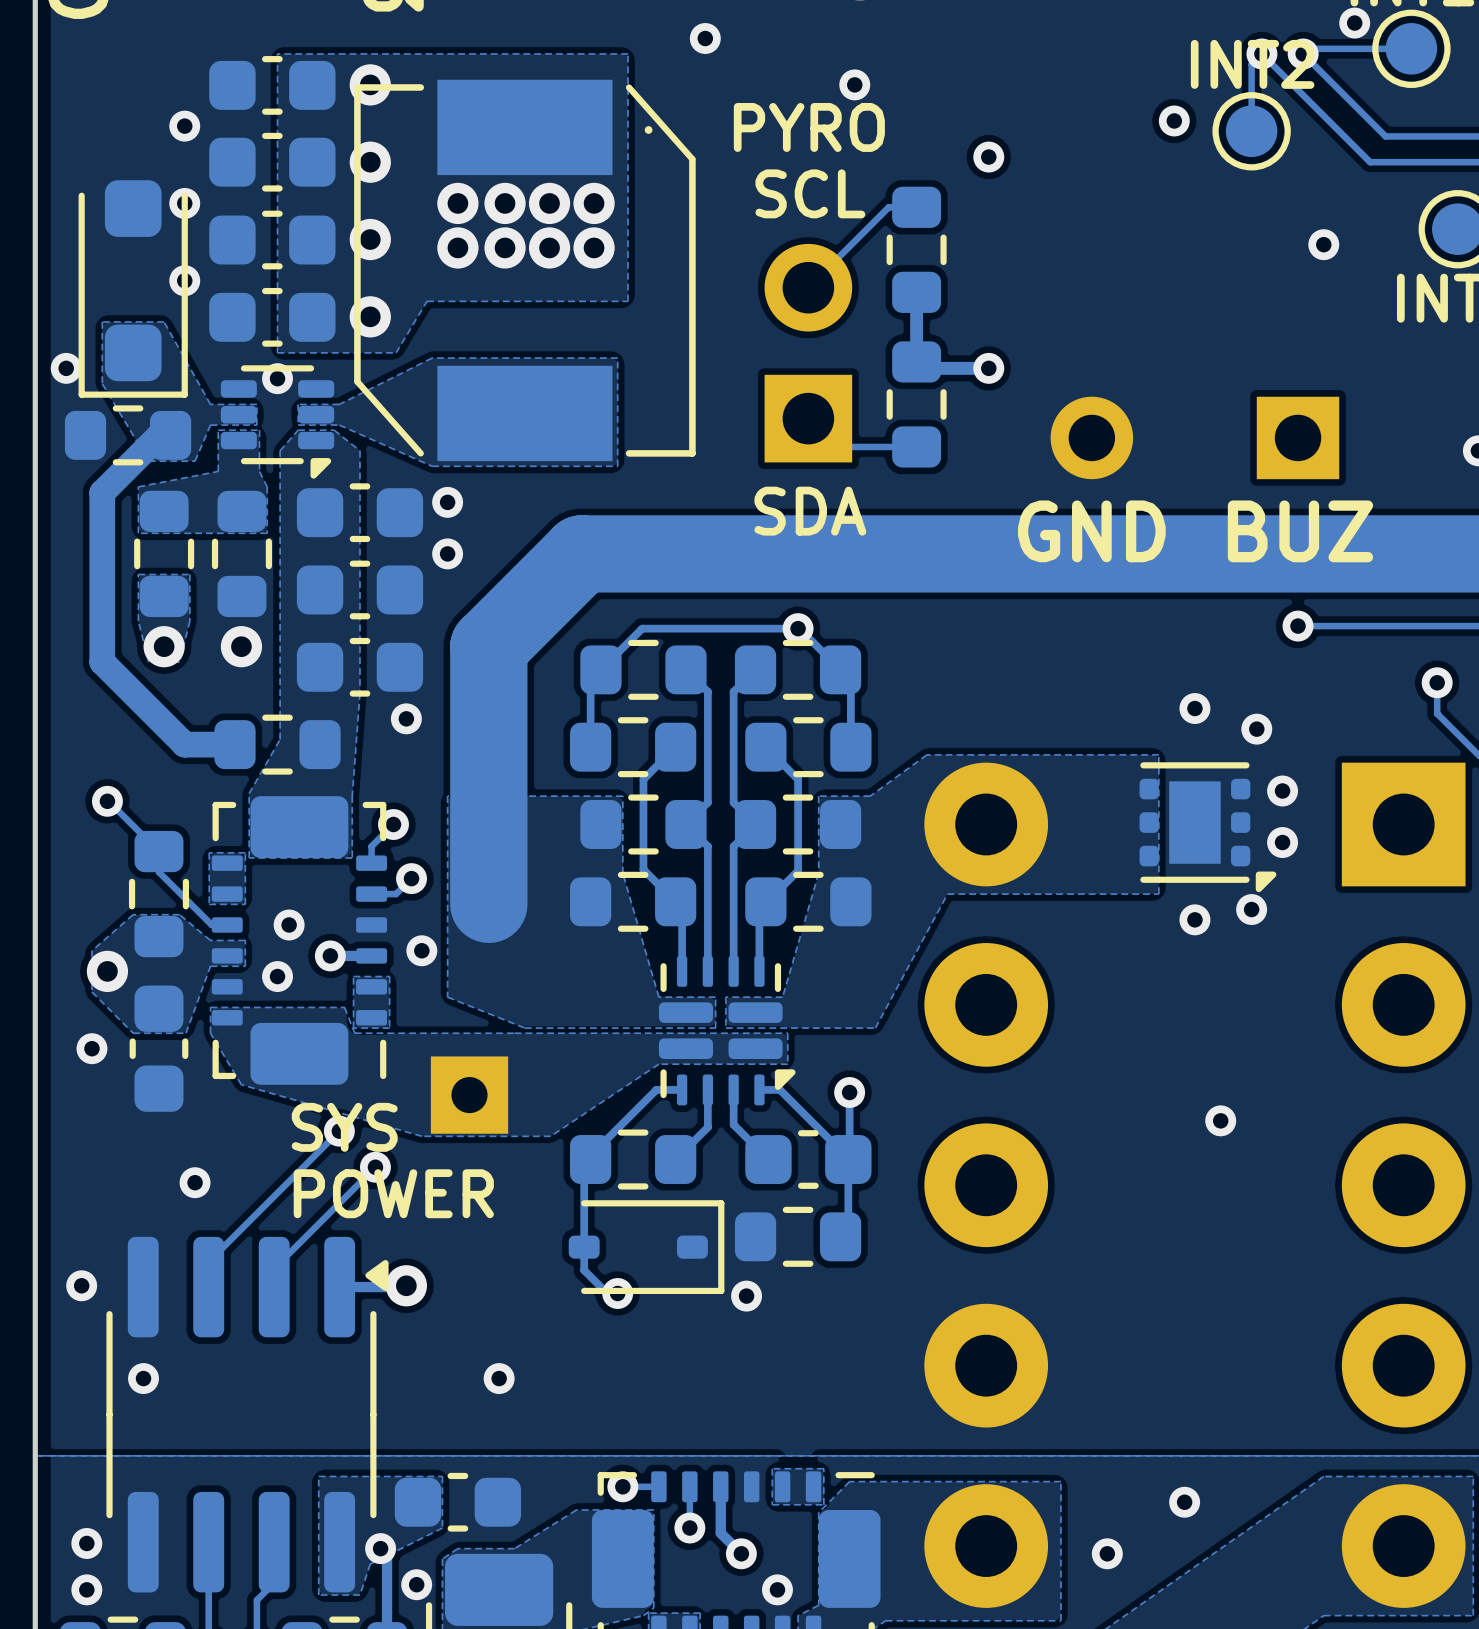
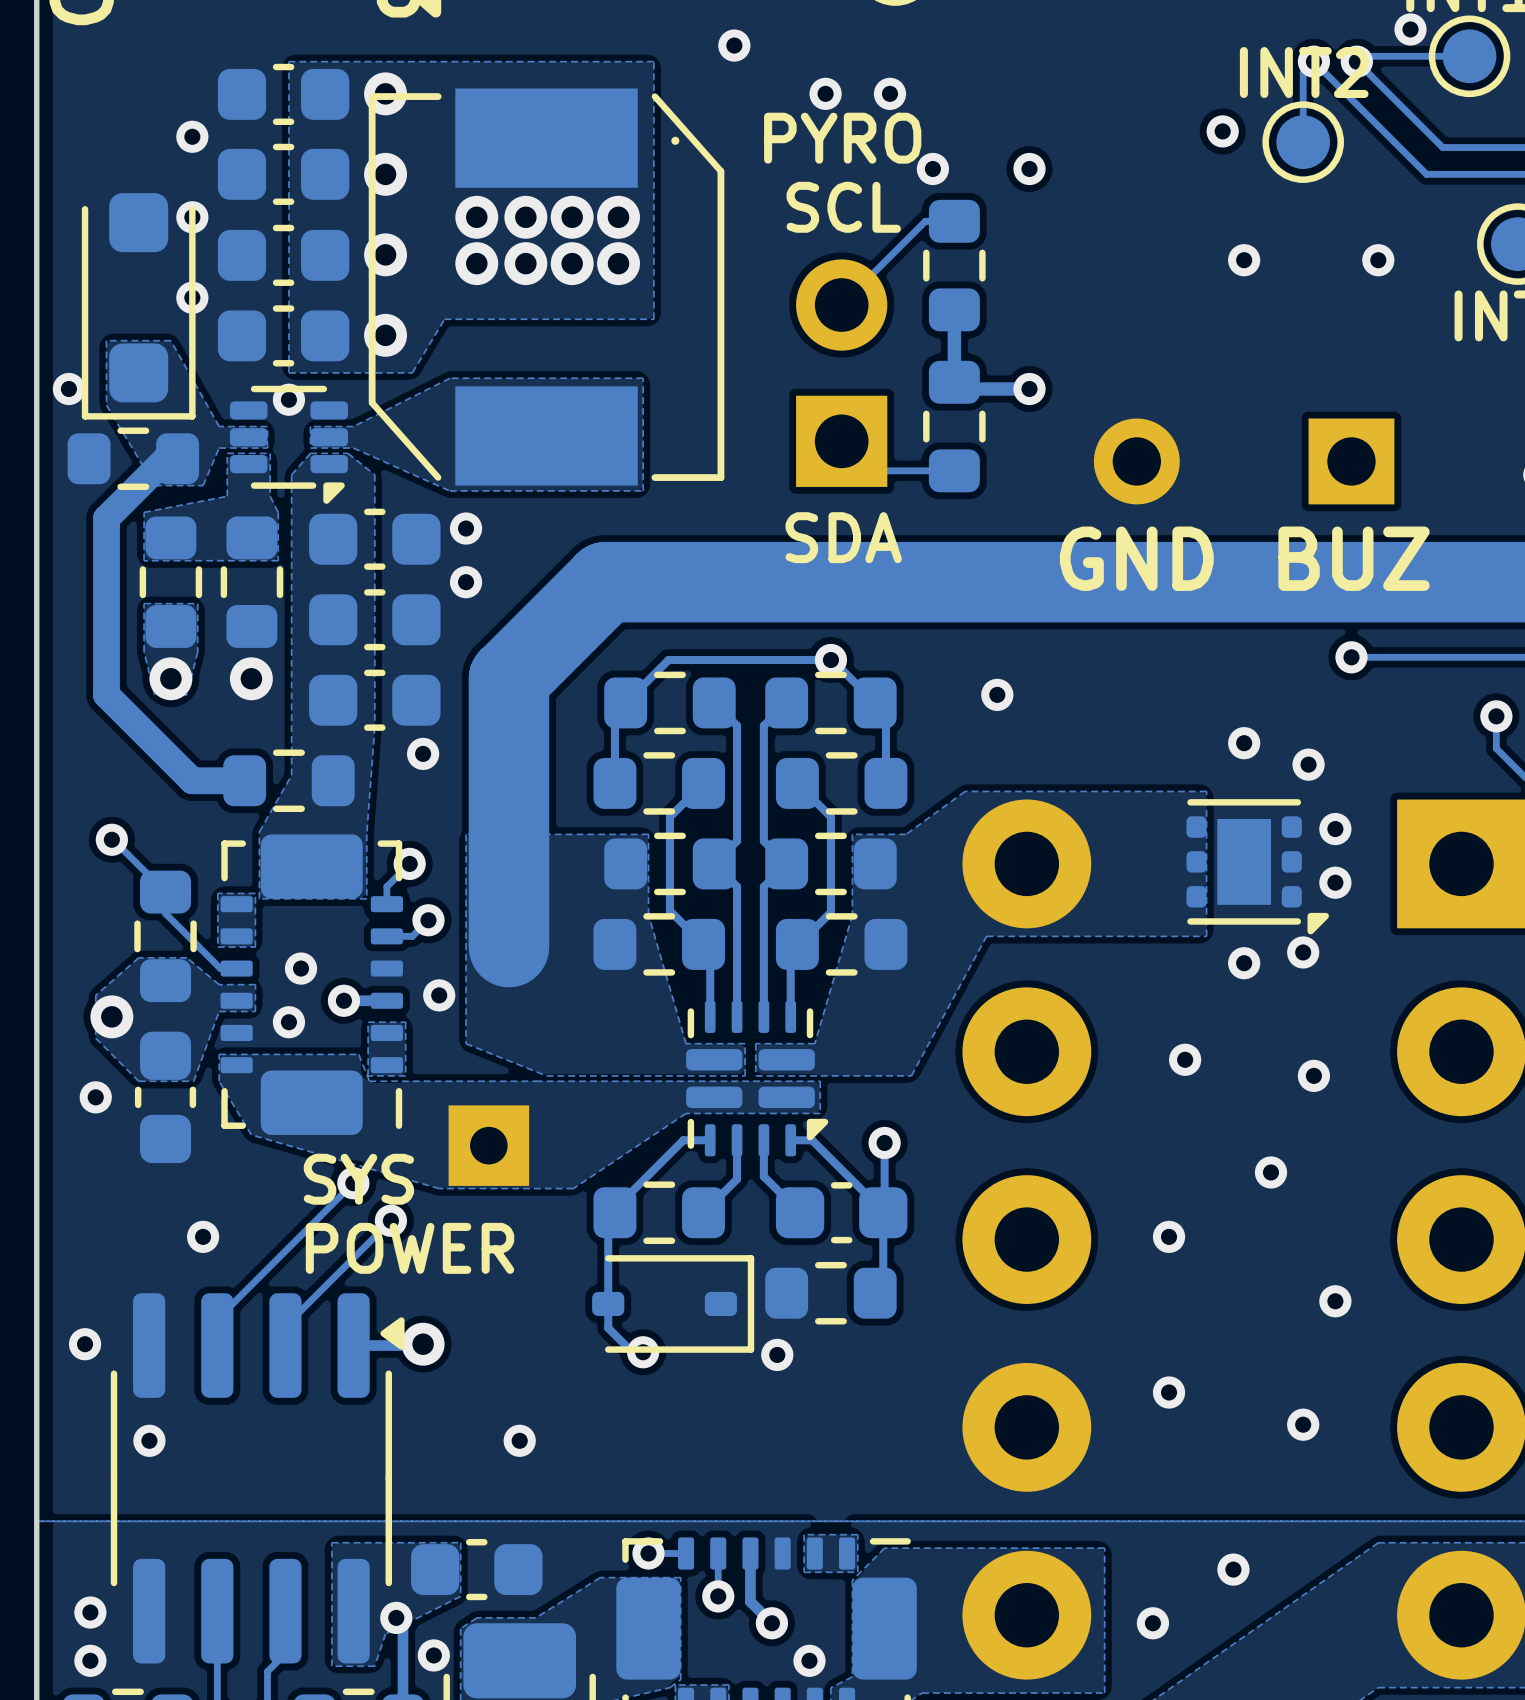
via: none -> (825, 93)
via: none -> (932, 168)
via: none -> (1244, 260)
via: none -> (997, 694)
via: none -> (1185, 1059)
via: none -> (1313, 1075)
via: none -> (1169, 1236)
via: none -> (1335, 1301)
via: none -> (1169, 1392)
via: none -> (1303, 1424)

